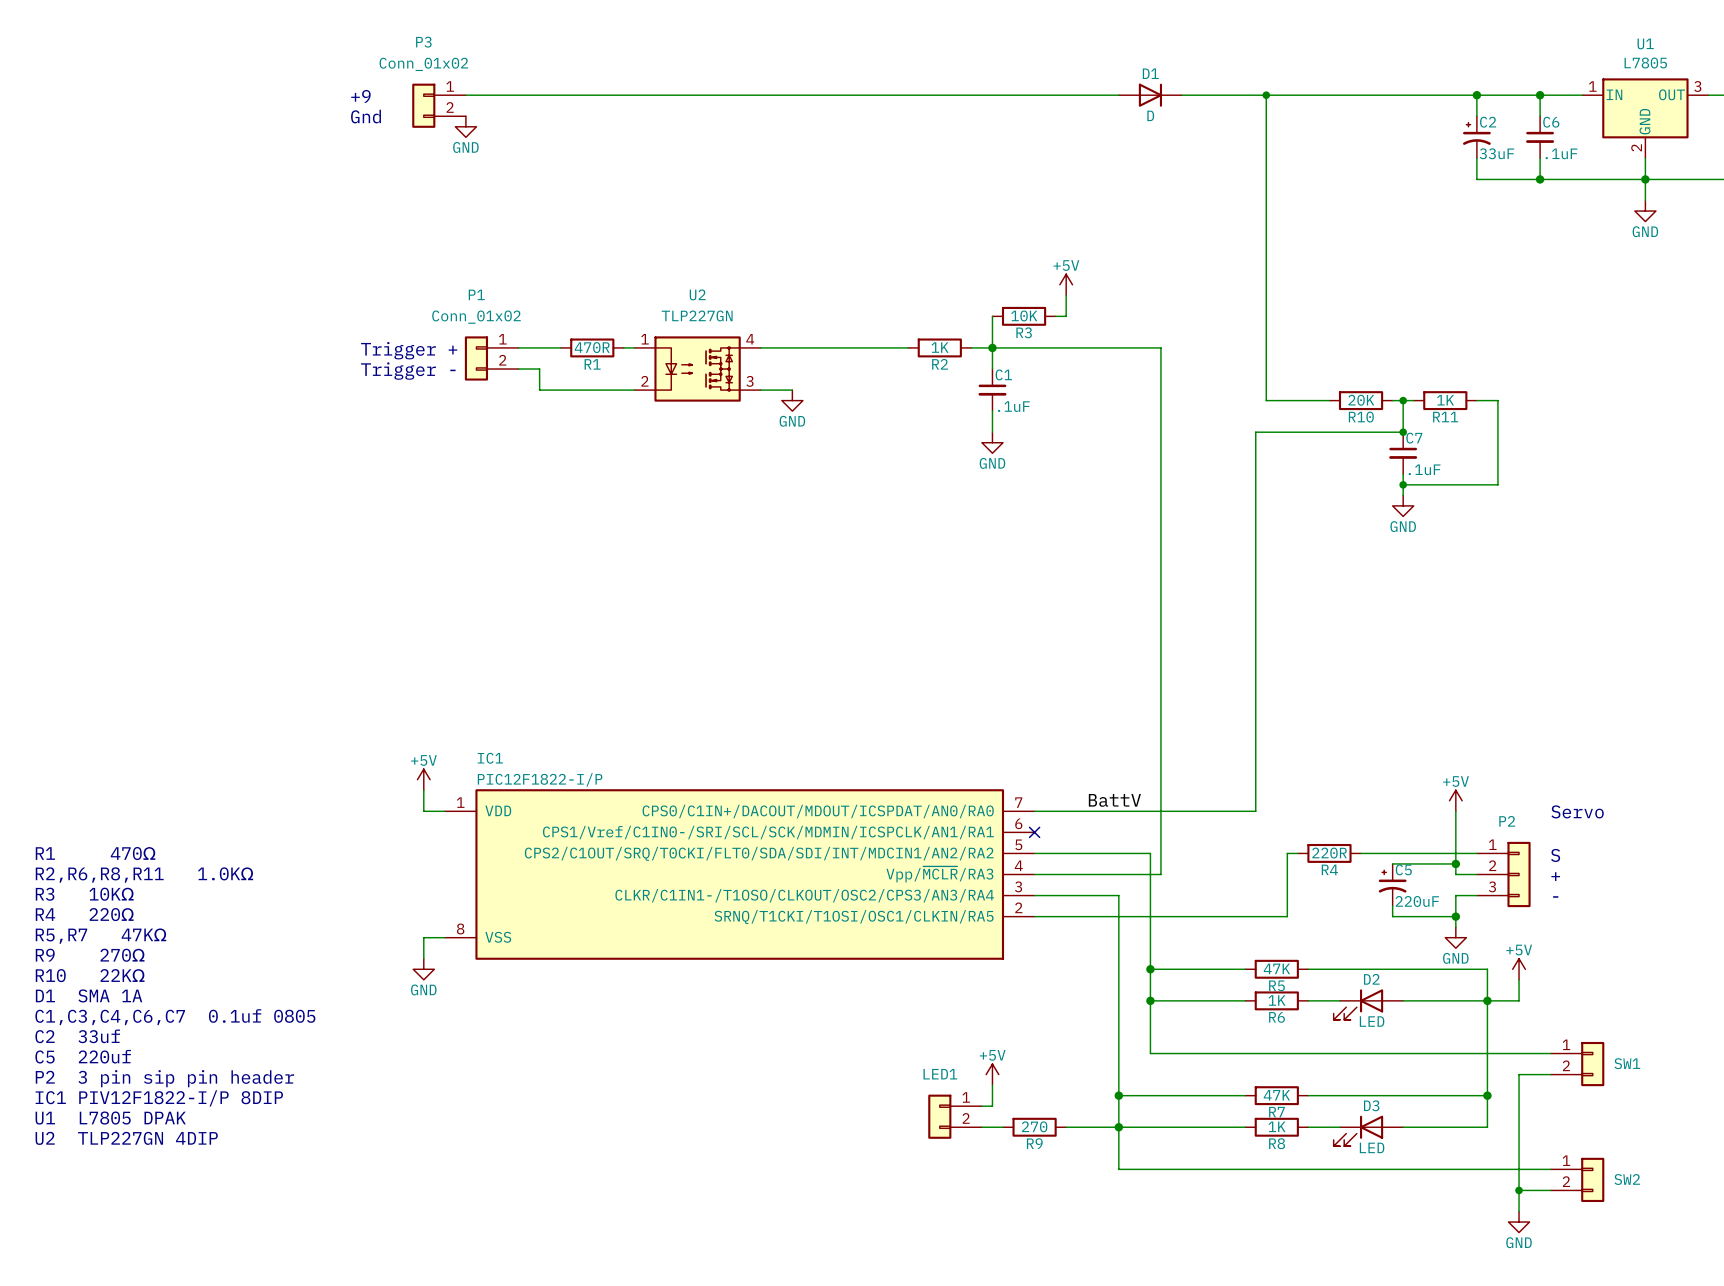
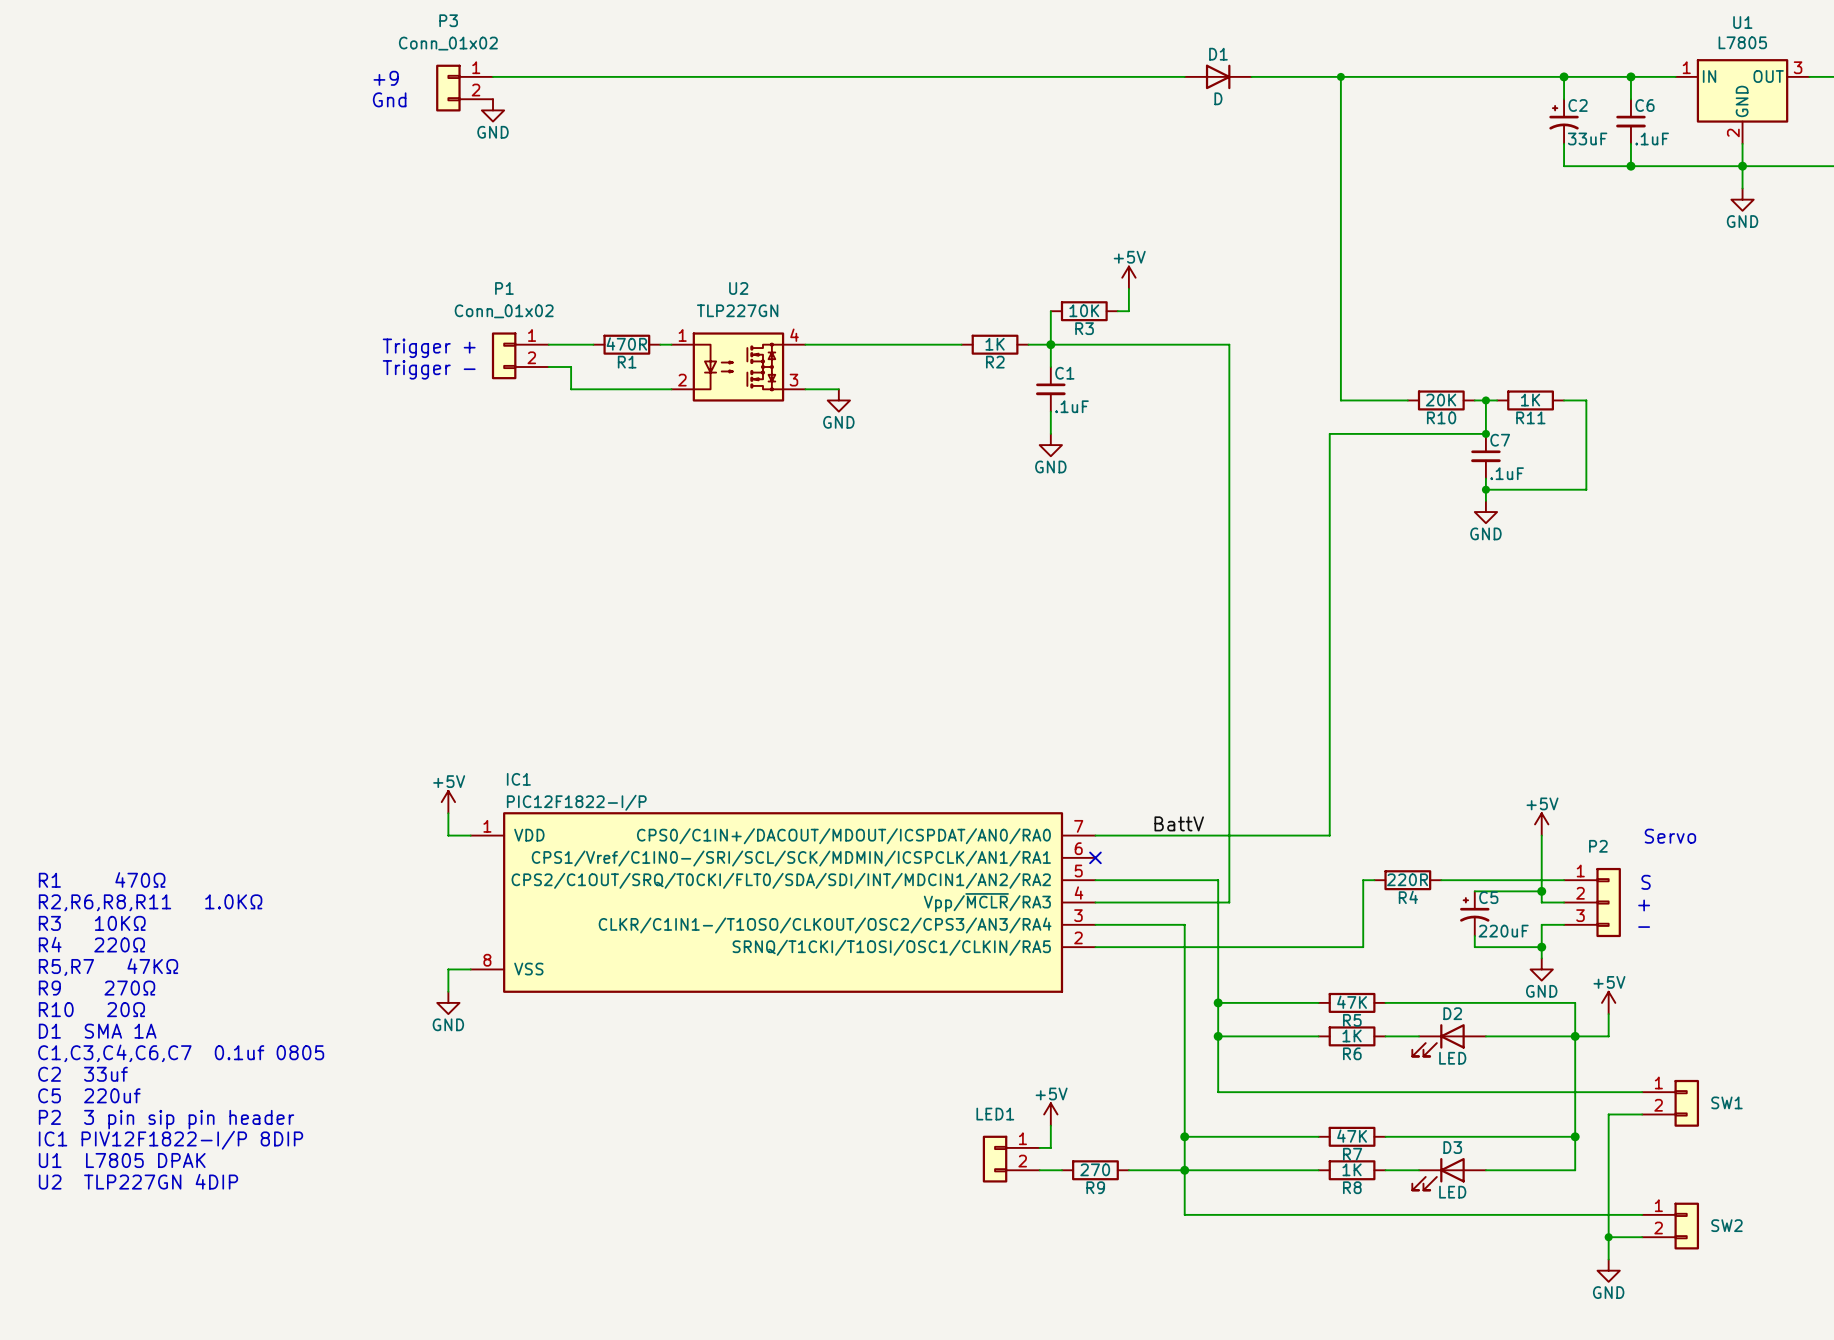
text: R10 22KΩ (90, 975) -> R10 20Ω (91, 1009)

